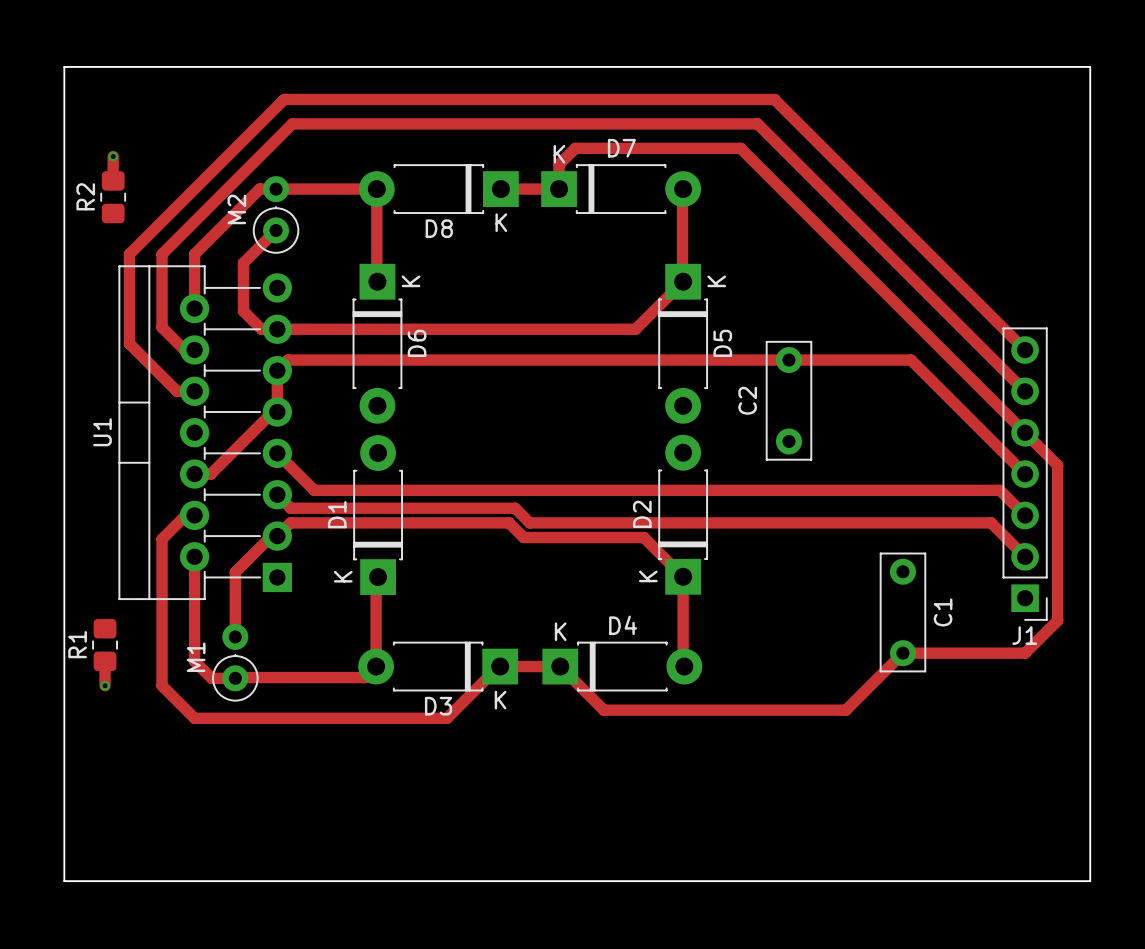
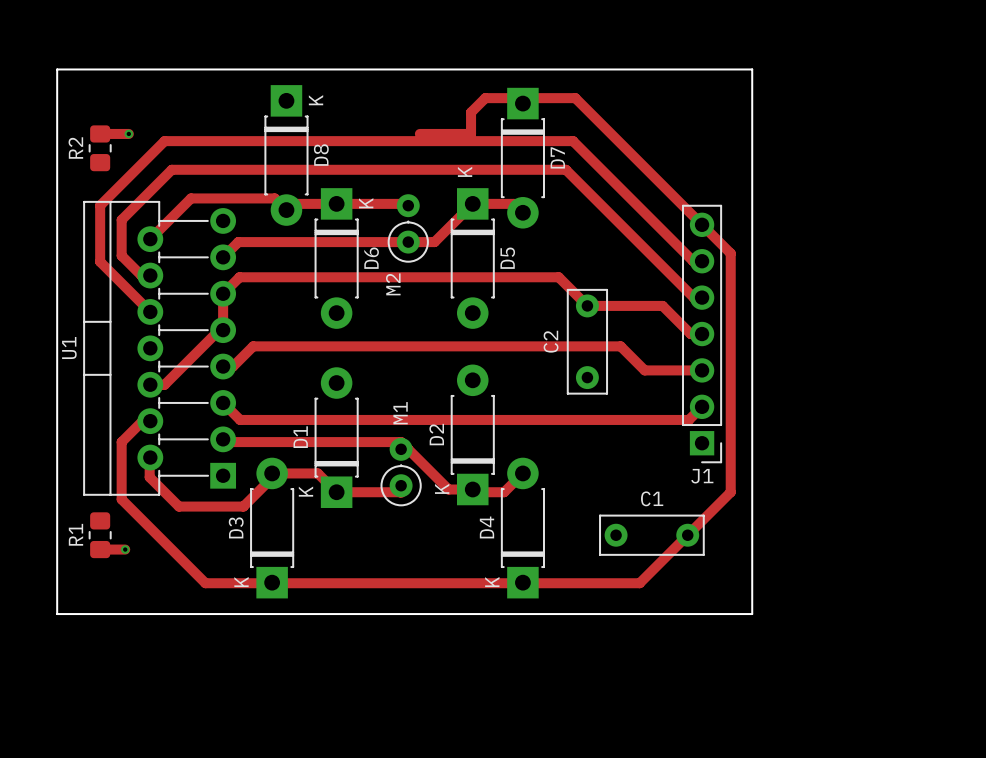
board edge: (64, 66) (1090, 66) (1090, 881) (64, 881) (64, 66) -> (57, 69) (57, 614) (752, 614) (752, 69) (57, 69)
D7 name position: D7 (621, 148) -> D7 (557, 157)
track: (677, 148) (740, 148) (1057, 465) (1057, 620) (1025, 653) (902, 653) (845, 710) (603, 710) (560, 666) (498, 666) (447, 718) (194, 718) (162, 685) (162, 604) -> (575, 98) (730, 253) (730, 492) (639, 583) (205, 583) (121, 499)
track: (113, 156) (113, 180) -> none
via position: (113, 156) -> (128, 133)
D7 footprint: [541, 164, 702, 214] -> [501, 87, 545, 229]
track: none -> (100, 133) (128, 133)
D8 rotation: 0° (438, 189) -> 90° counterclockwise (286, 155)
track: (683, 189) (682, 282) (635, 329) (261, 329) (243, 311) (243, 263) (276, 230) -> none
R2 position: (113, 197) -> (100, 148)
M2 name position: M2 (236, 209) -> M2 (393, 284)
M2 position: (276, 214) -> (408, 228)
track: (219, 229) (259, 189) (376, 189) (377, 281) -> (171, 169) (565, 169) (693, 297) (702, 297)
track: (194, 254) (194, 308) -> (150, 191) (121, 219)
track: none -> (408, 205) (406, 203) (280, 203) (274, 198) (191, 198) (150, 239)
track: none -> (522, 212) (514, 203) (472, 203) (434, 242) (238, 242) (223, 257)
D5 text position: K (716, 281) -> K (465, 171)
track: (162, 286) (162, 254) (292, 123) (757, 123) (1025, 391) -> none
D6 position: (377, 343) -> (336, 258)
D5 position: (683, 343) -> (472, 258)
track: (1023, 351) (1025, 350) (774, 99) (284, 99) (129, 254) (129, 343) (177, 391) (194, 391) -> (702, 261) (693, 261) (573, 141) (164, 141) (100, 205) (100, 261) (150, 311)
track: (287, 360) (911, 360) (1025, 474) -> (232, 284) (239, 277) (558, 277) (587, 305) (662, 305) (690, 334) (702, 334)
C2 position: (788, 400) -> (587, 341)
track: (277, 453) (314, 490) (999, 490) (1025, 515) -> (223, 366) (233, 366) (253, 346) (620, 346) (644, 370) (702, 370)
J1 position: (1025, 474) -> (702, 334)
track: (290, 508) (515, 508) (529, 522) (991, 522) (1025, 556) -> (235, 414) (240, 419) (688, 419) (702, 406)
D2 position: (683, 514) -> (472, 434)
D1 position: (378, 515) -> (336, 437)
track: (271, 536) (235, 572) (235, 636) -> none
track: (277, 536) (290, 522) (509, 522) (523, 537) (643, 537) (683, 576) (684, 666) -> (223, 439) (225, 442) (401, 442) (448, 489) (504, 492) (522, 473) (522, 475)
track: (194, 556) (194, 661) (211, 678) (365, 677) (376, 666) (376, 579) (378, 577) -> (150, 457) (149, 477) (178, 506) (243, 506) (272, 477) (272, 473) (317, 473) (336, 492) (401, 492)
C1 rotation: 0° (902, 612) -> 90° clockwise (651, 535)
C1 position: (902, 612) -> (651, 535)
C1 name position: C1 (943, 612) -> C1 (652, 498)
R1 position: (105, 645) -> (100, 535)
M1 name position: M1 (196, 657) -> M1 (400, 413)
track: (105, 661) (105, 685) -> none
track: none -> (103, 549) (125, 549)
M1 position: (235, 662) -> (401, 472)
D3 rotation: 0° (438, 666) -> 90° clockwise (272, 528)
D3 position: (438, 666) -> (272, 528)
D4 rotation: 0° (622, 666) -> 90° counterclockwise (522, 528)
via position: (105, 685) -> (125, 549)

